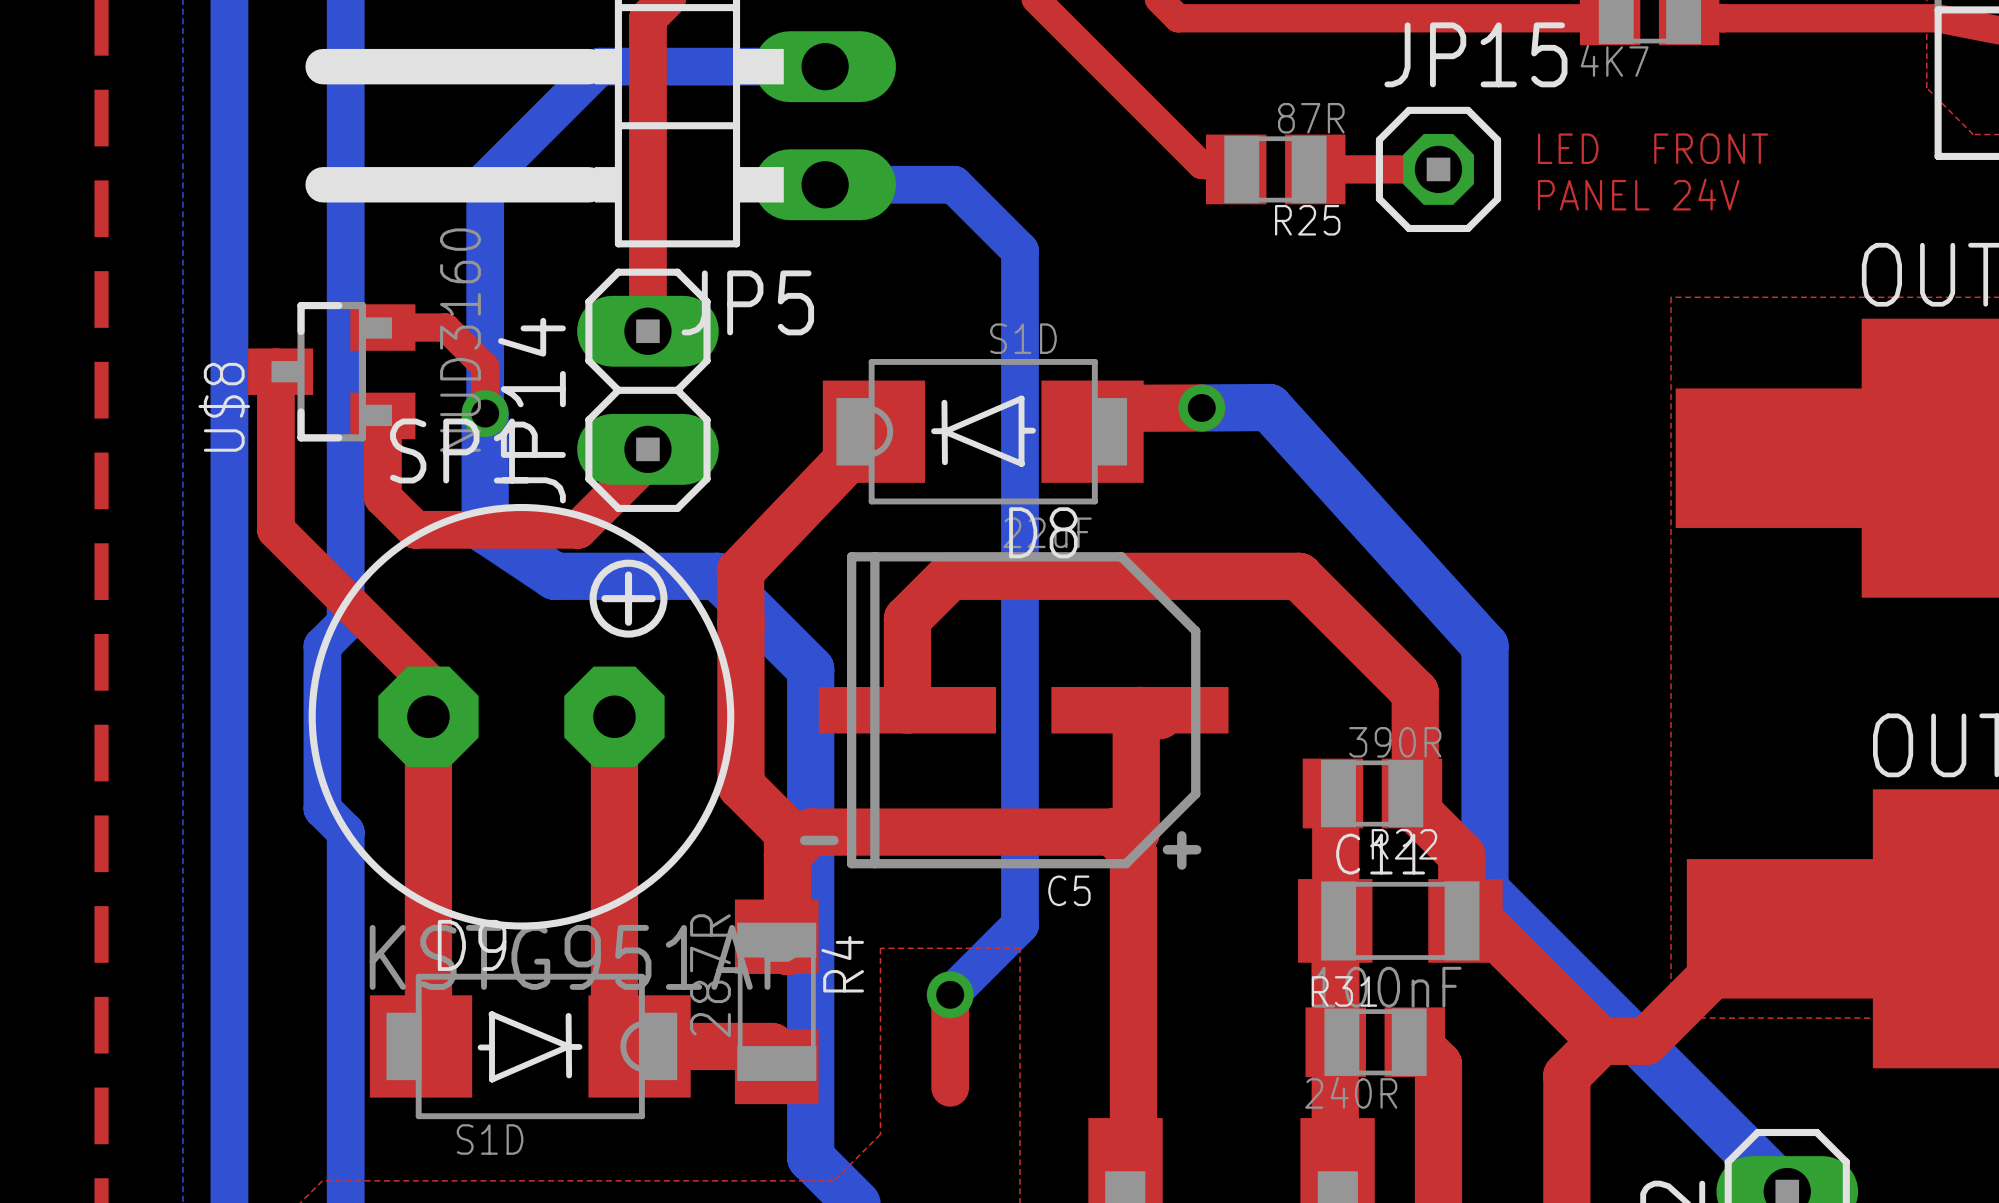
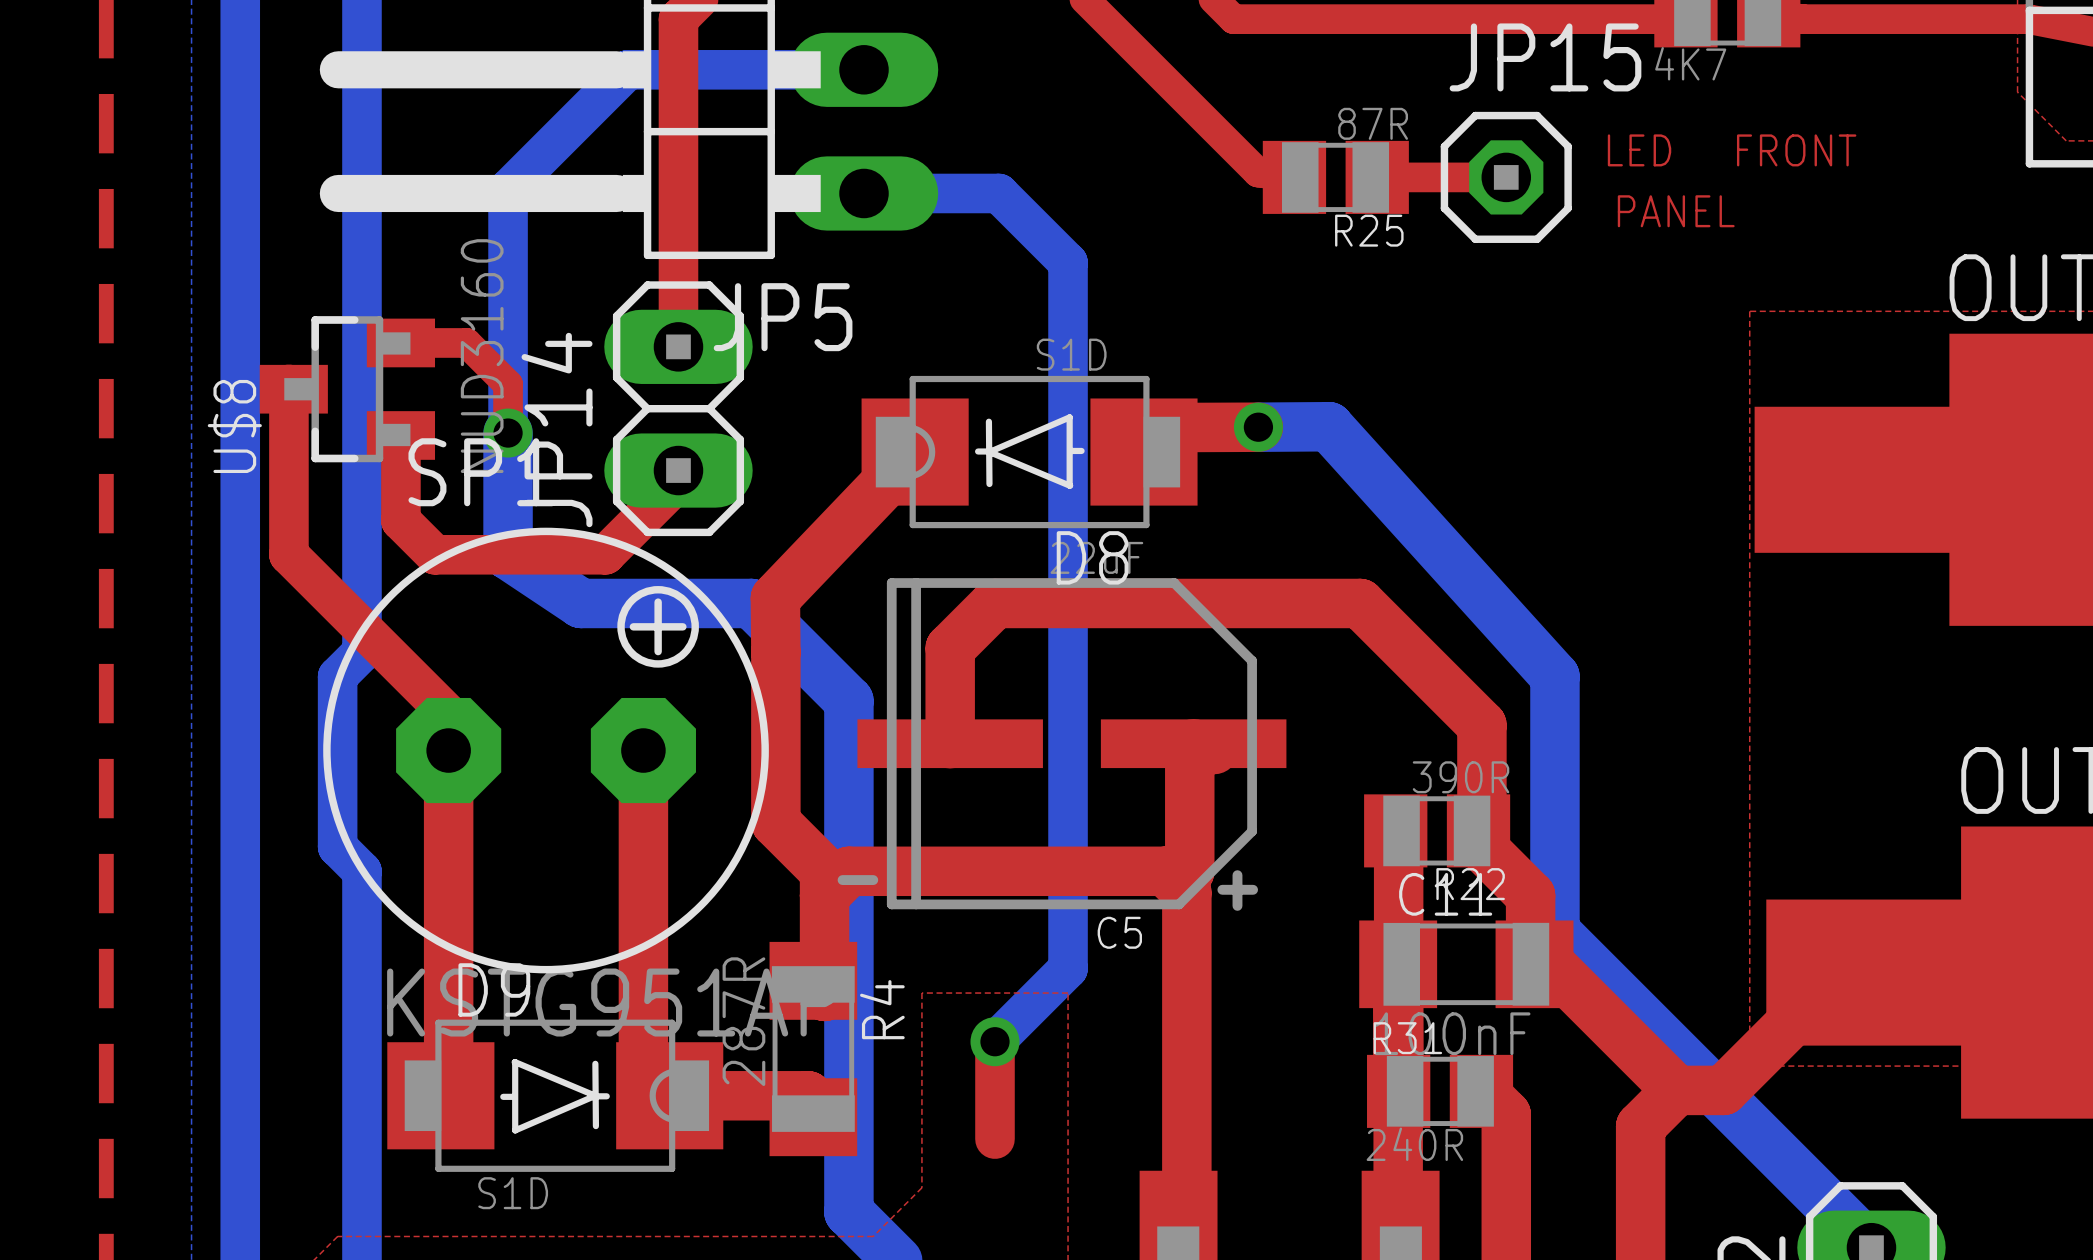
text position: LED (1568, 148) -> LED (1639, 150)
text position: FRONT (1711, 148) -> FRONT (1796, 150)
text: PANEL 24V (1638, 194) -> PANEL (1676, 211)

